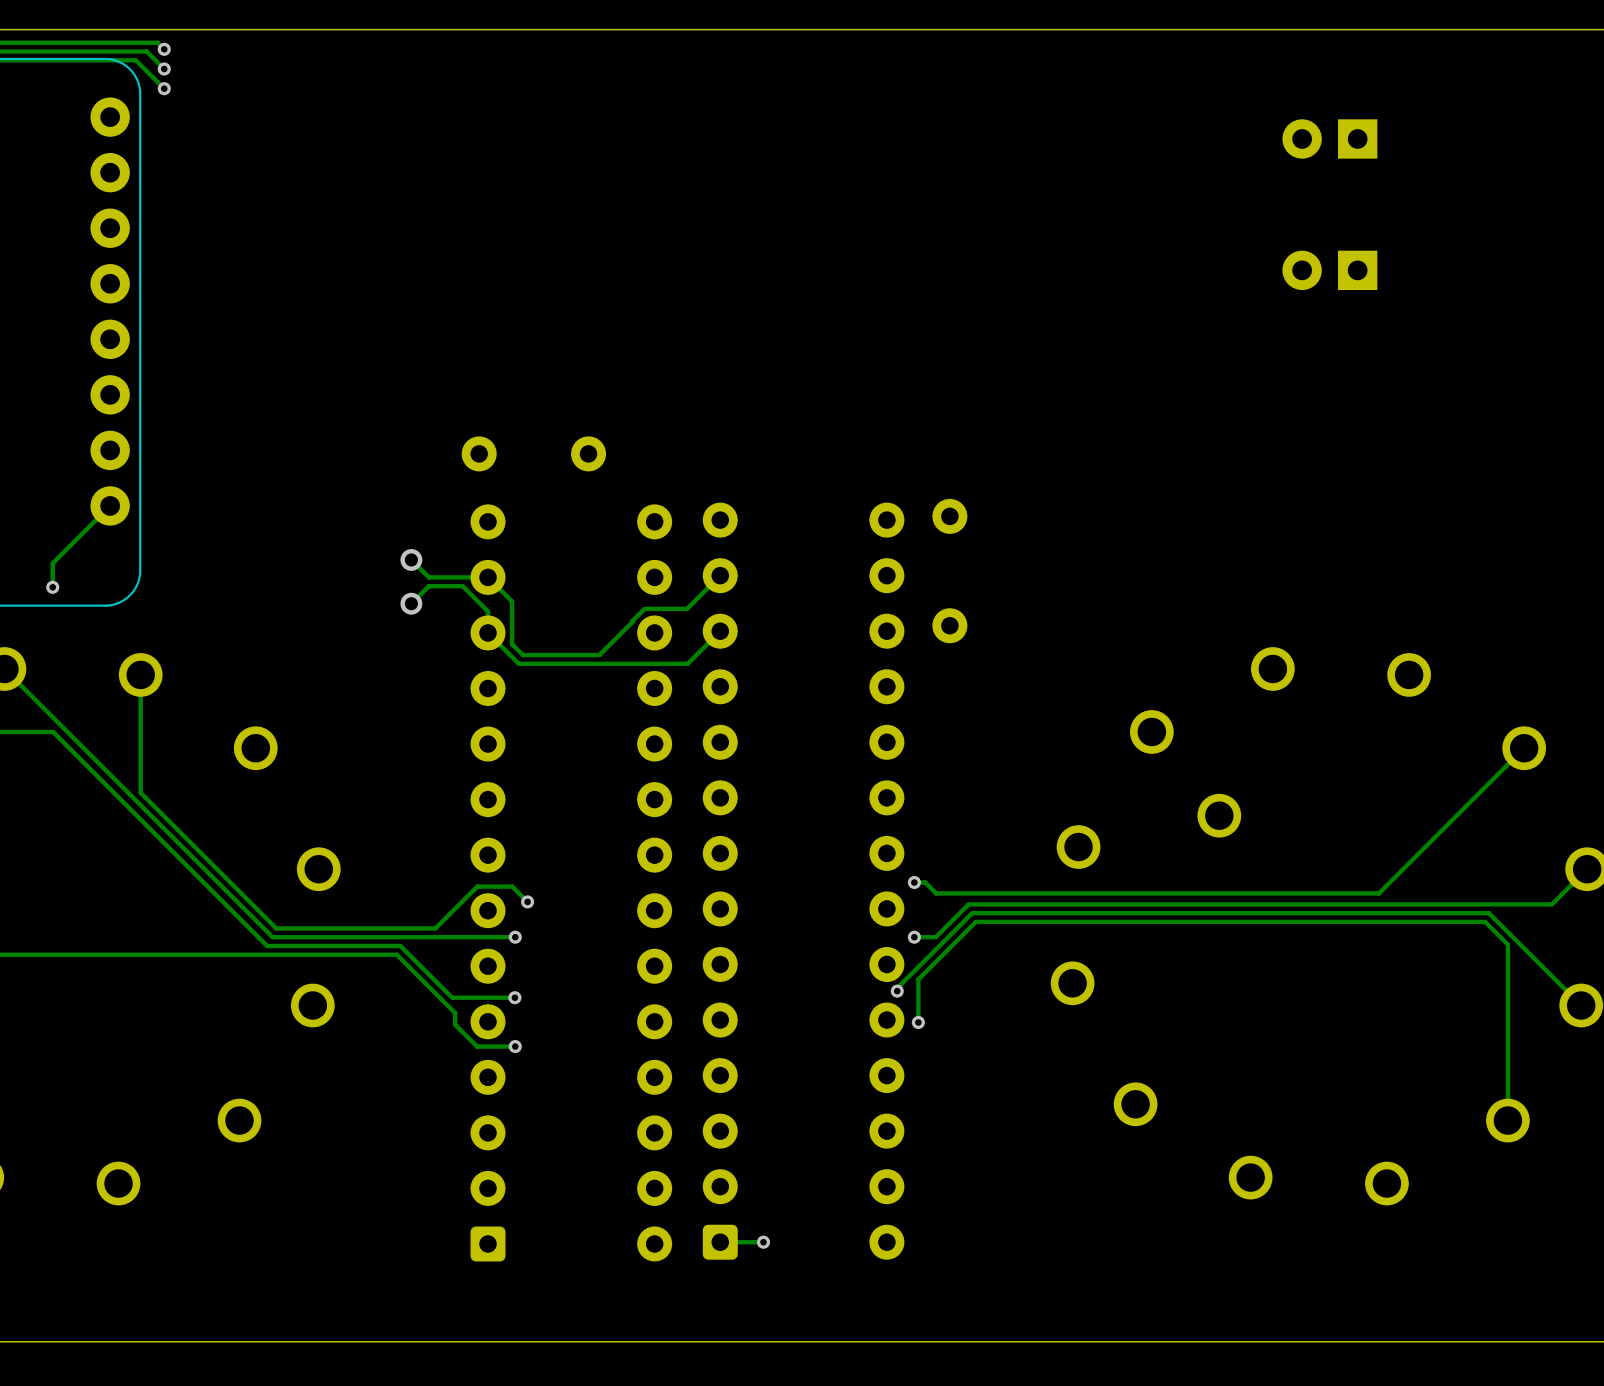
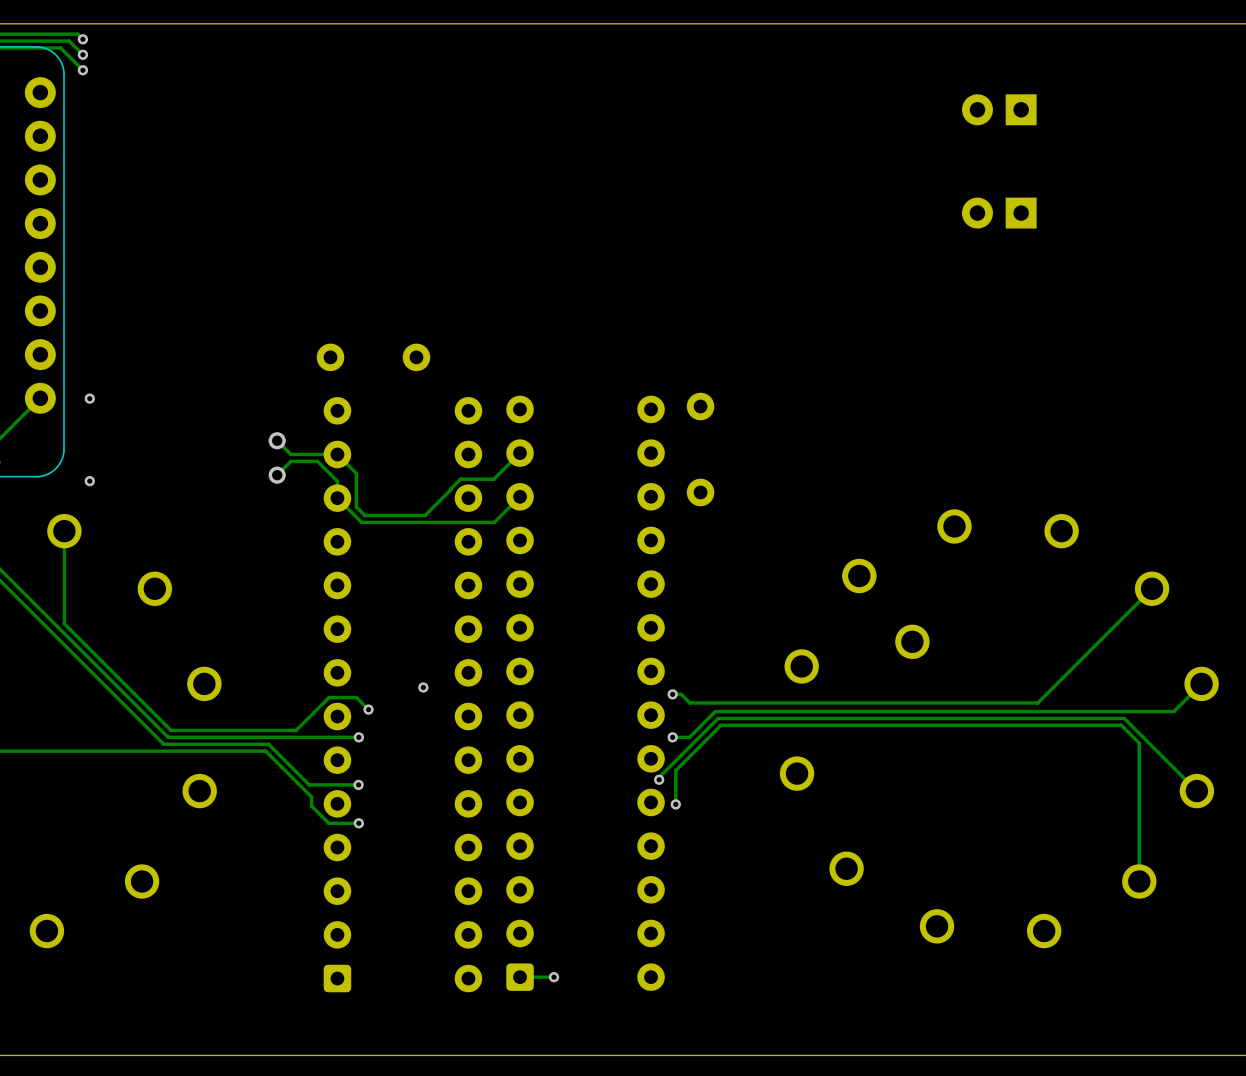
via: none -> (89, 398)
via: none -> (89, 481)
via: none -> (423, 687)

